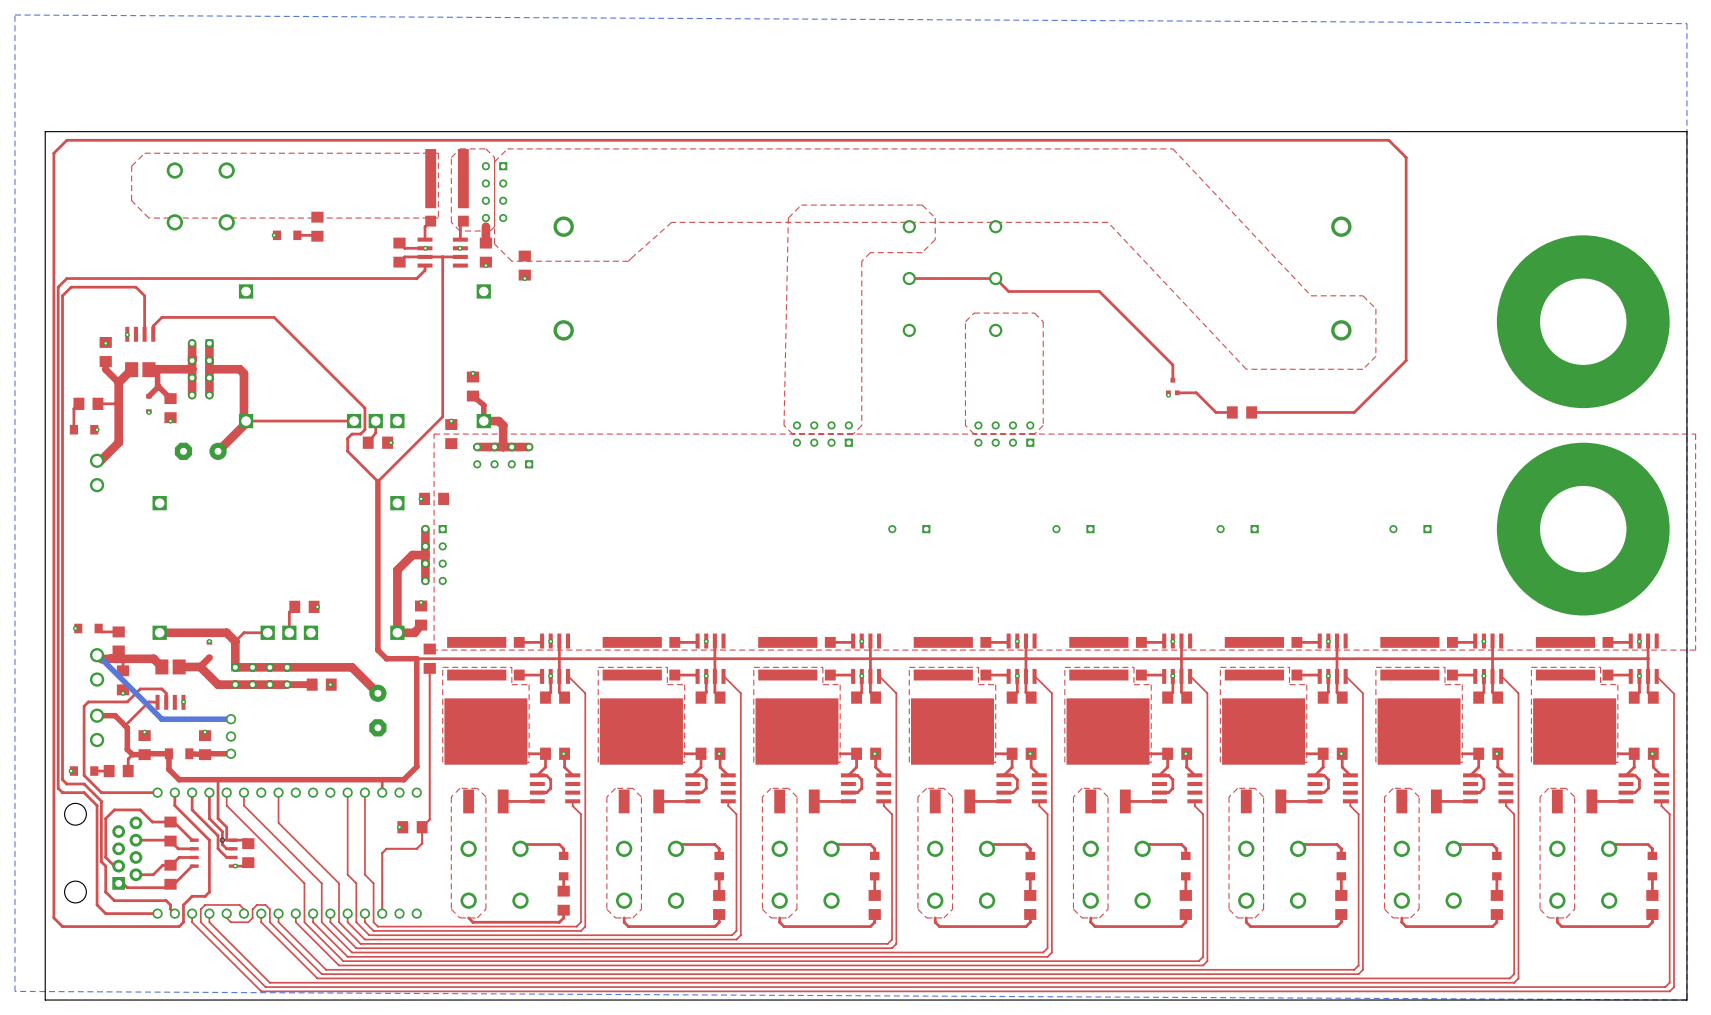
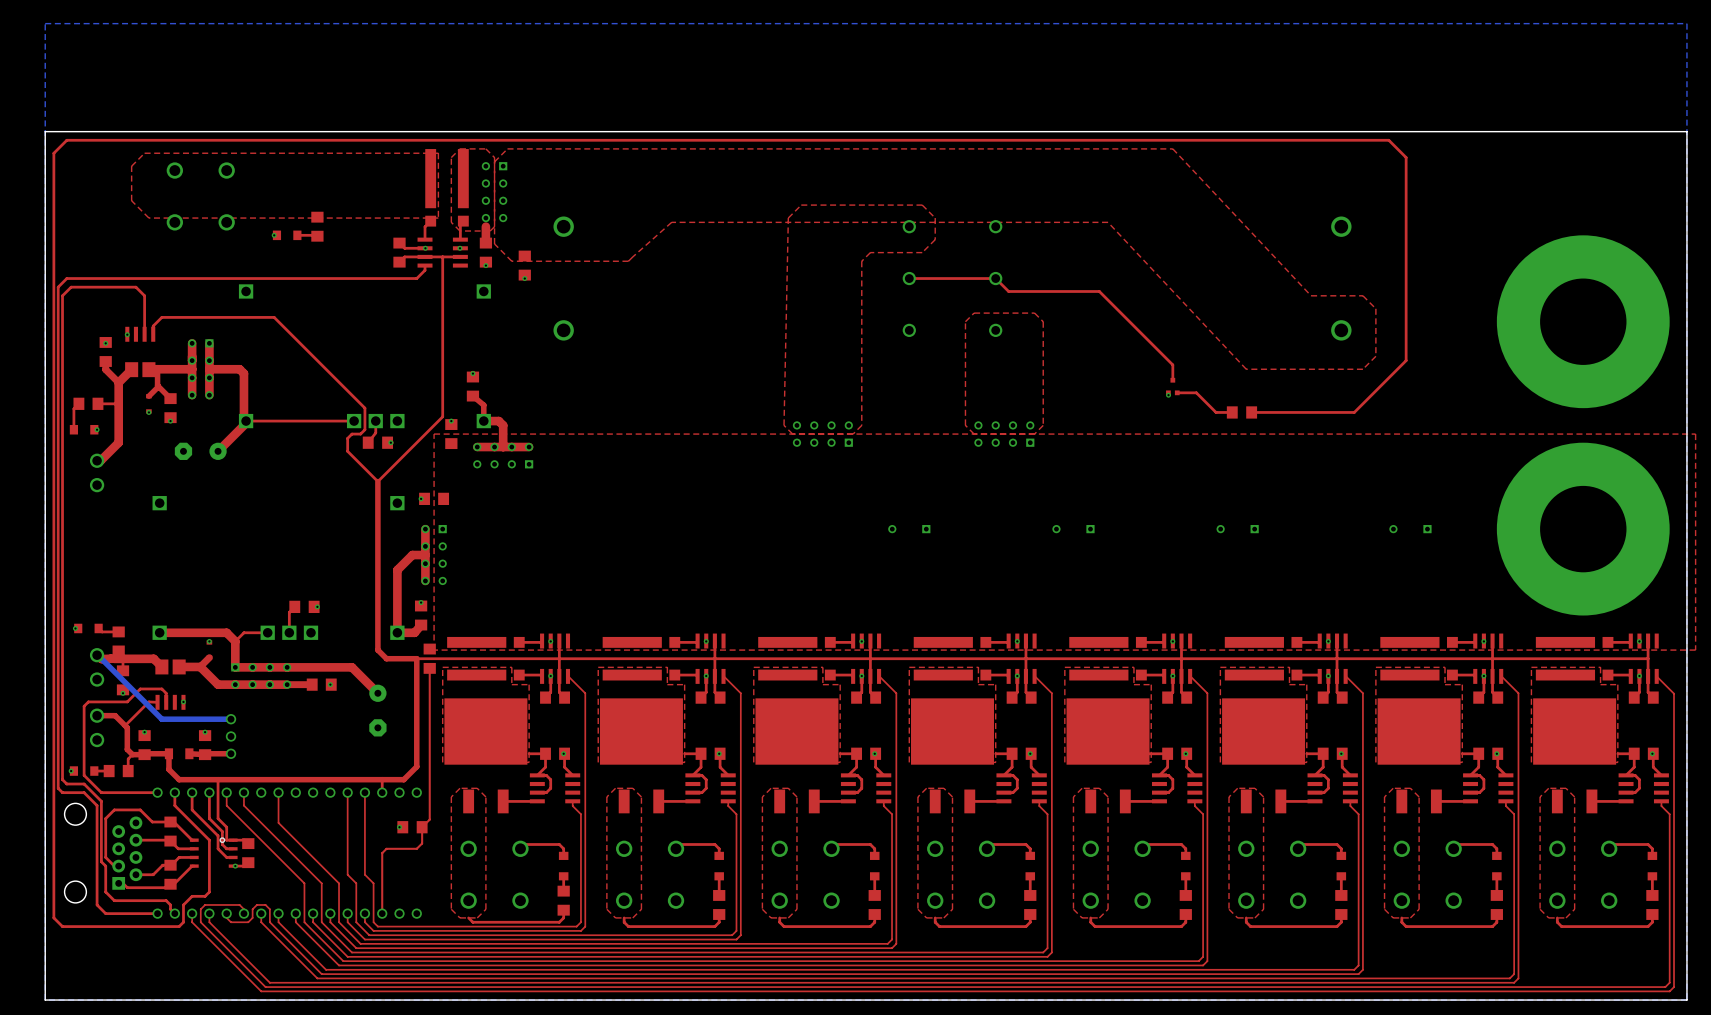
bottom zone outline: (1686, 23) (14, 14) (14, 991) (1686, 1000) -> (1686, 23) (45, 23) (45, 1000) (1686, 1000)

